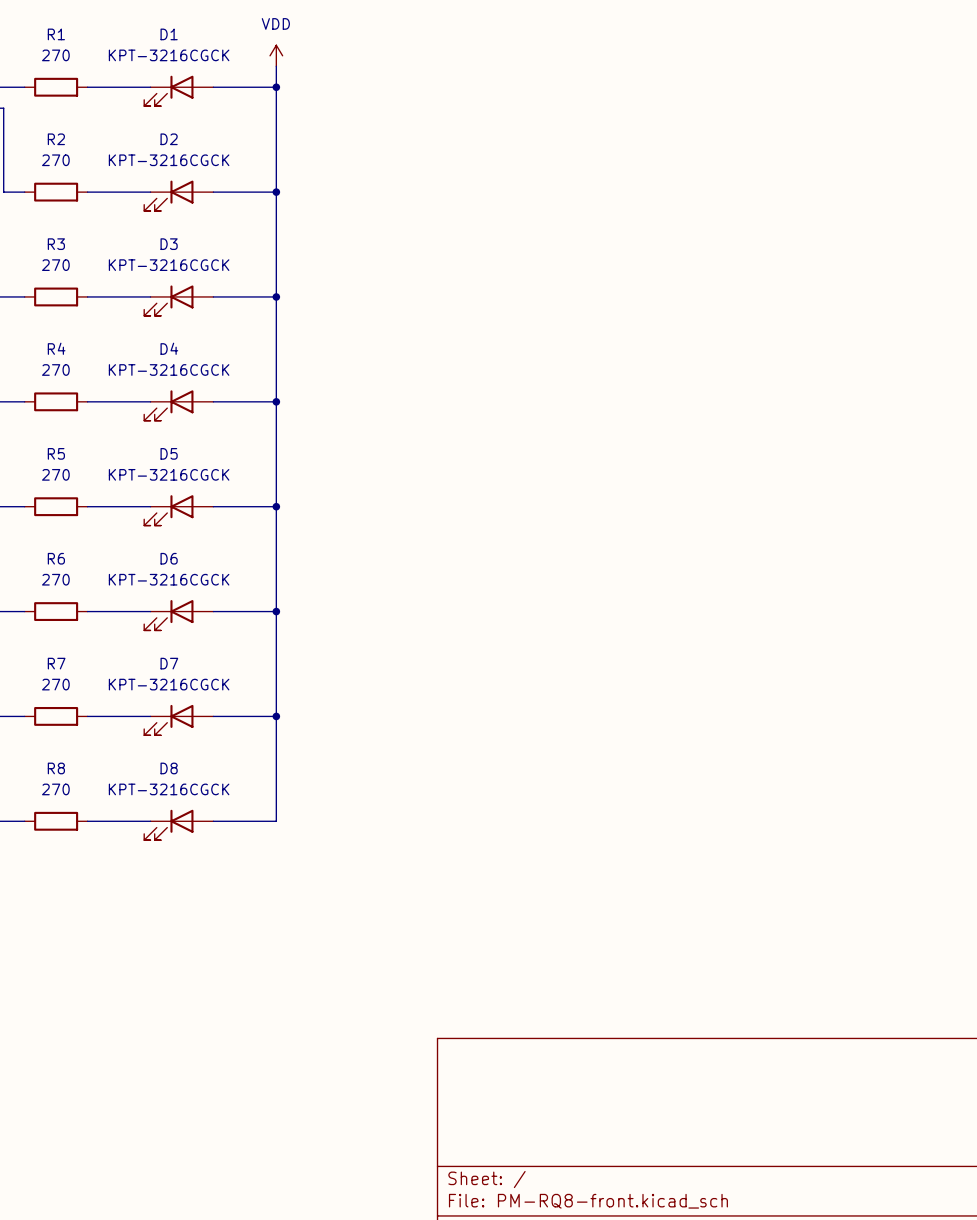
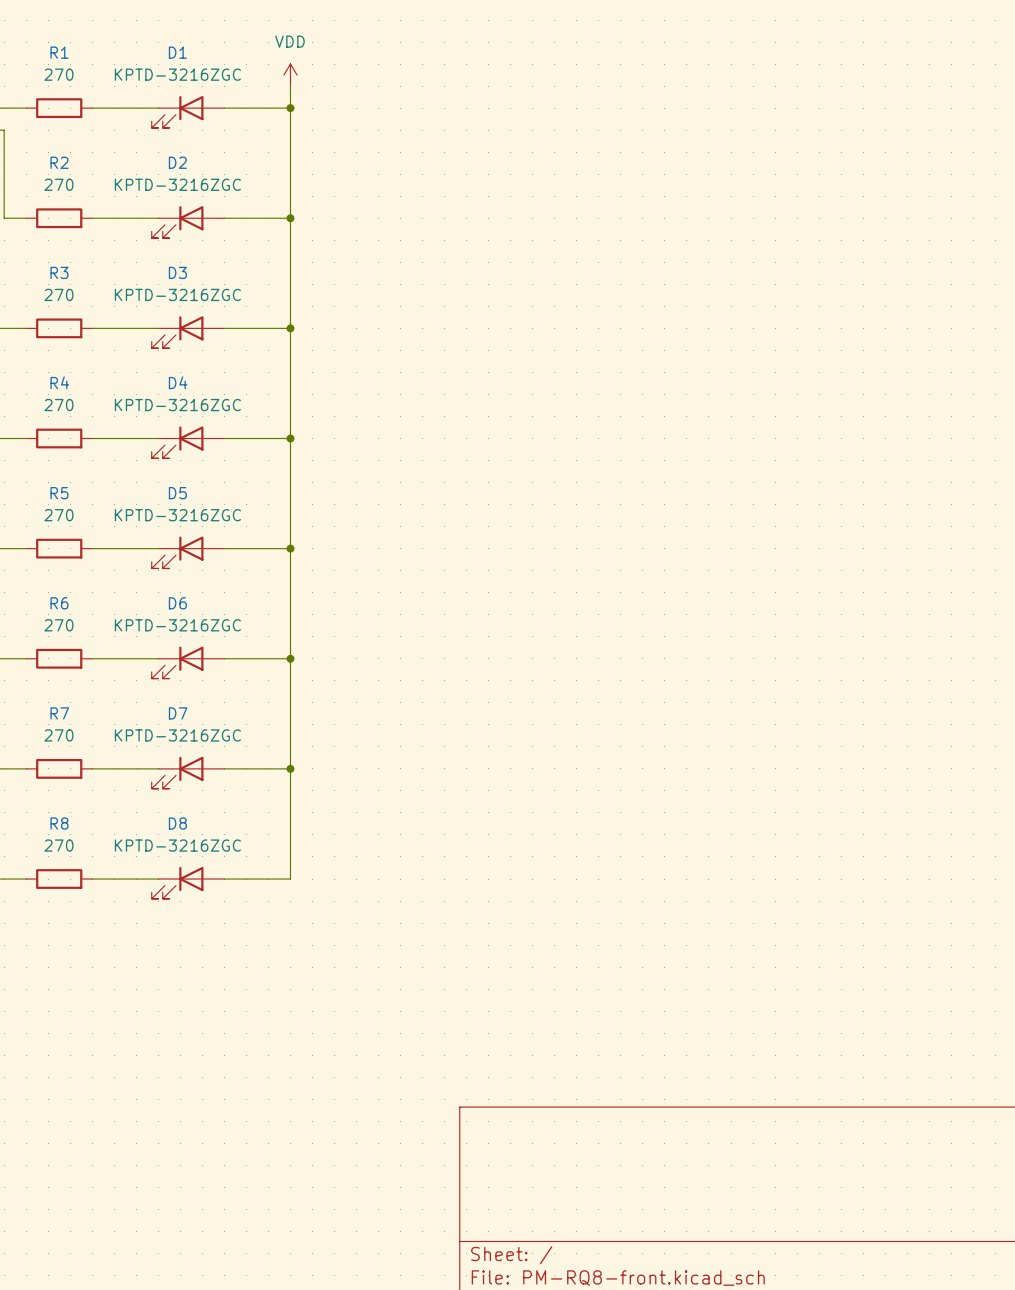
D1 value: KPT-3216CGCK (169, 55) -> KPTD-3216ZGC (177, 74)
D2 value: KPT-3216CGCK (169, 160) -> KPTD-3216ZGC (177, 184)
D3 value: KPT-3216CGCK (169, 265) -> KPTD-3216ZGC (177, 294)
D4 value: KPT-3216CGCK (169, 369) -> KPTD-3216ZGC (177, 405)
D5 value: KPT-3216CGCK (169, 474) -> KPTD-3216ZGC (177, 515)
D6 value: KPT-3216CGCK (169, 579) -> KPTD-3216ZGC (177, 625)
D7 value: KPT-3216CGCK (169, 684) -> KPTD-3216ZGC (177, 735)
D8 value: KPT-3216CGCK (169, 789) -> KPTD-3216ZGC (177, 845)

